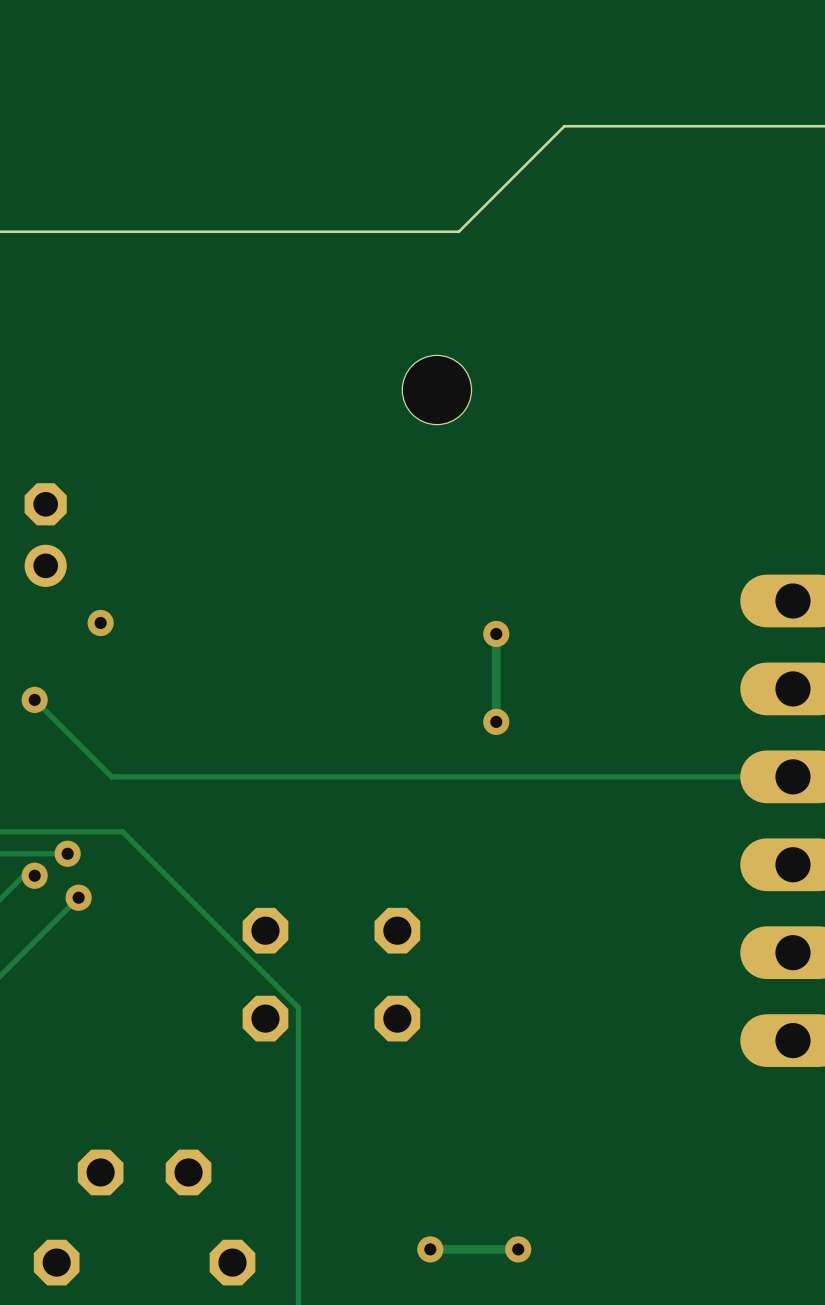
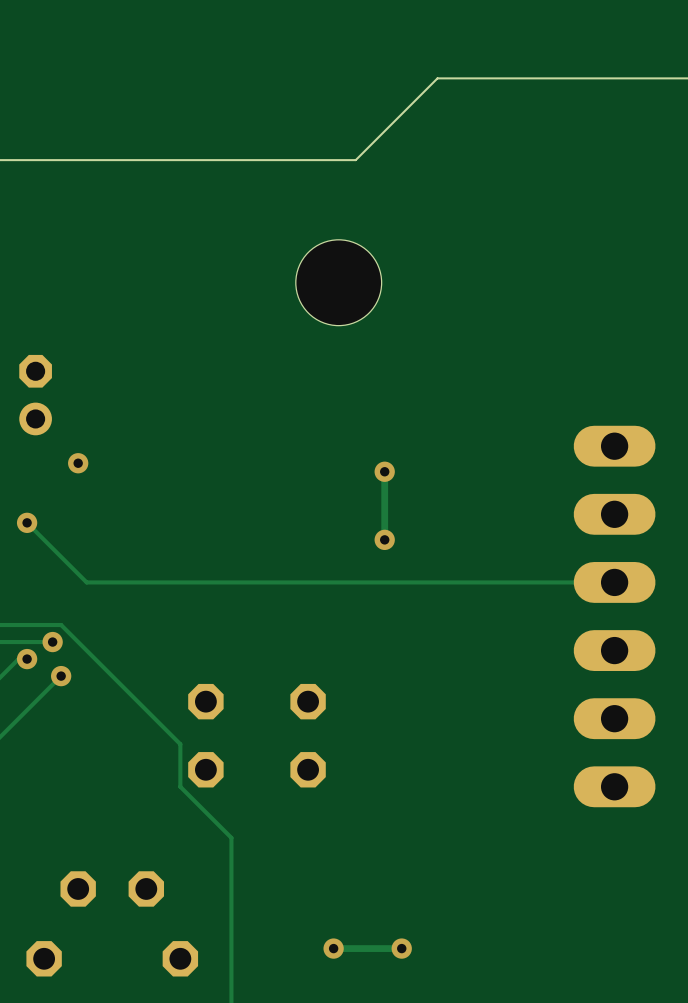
hole size: [402, 355, 472, 425] -> [295, 239, 382, 326]
track: (78, 831) (122, 831) (298, 1007) (298, 1106) -> (61, 625) (180, 744) (180, 786) (231, 837)

